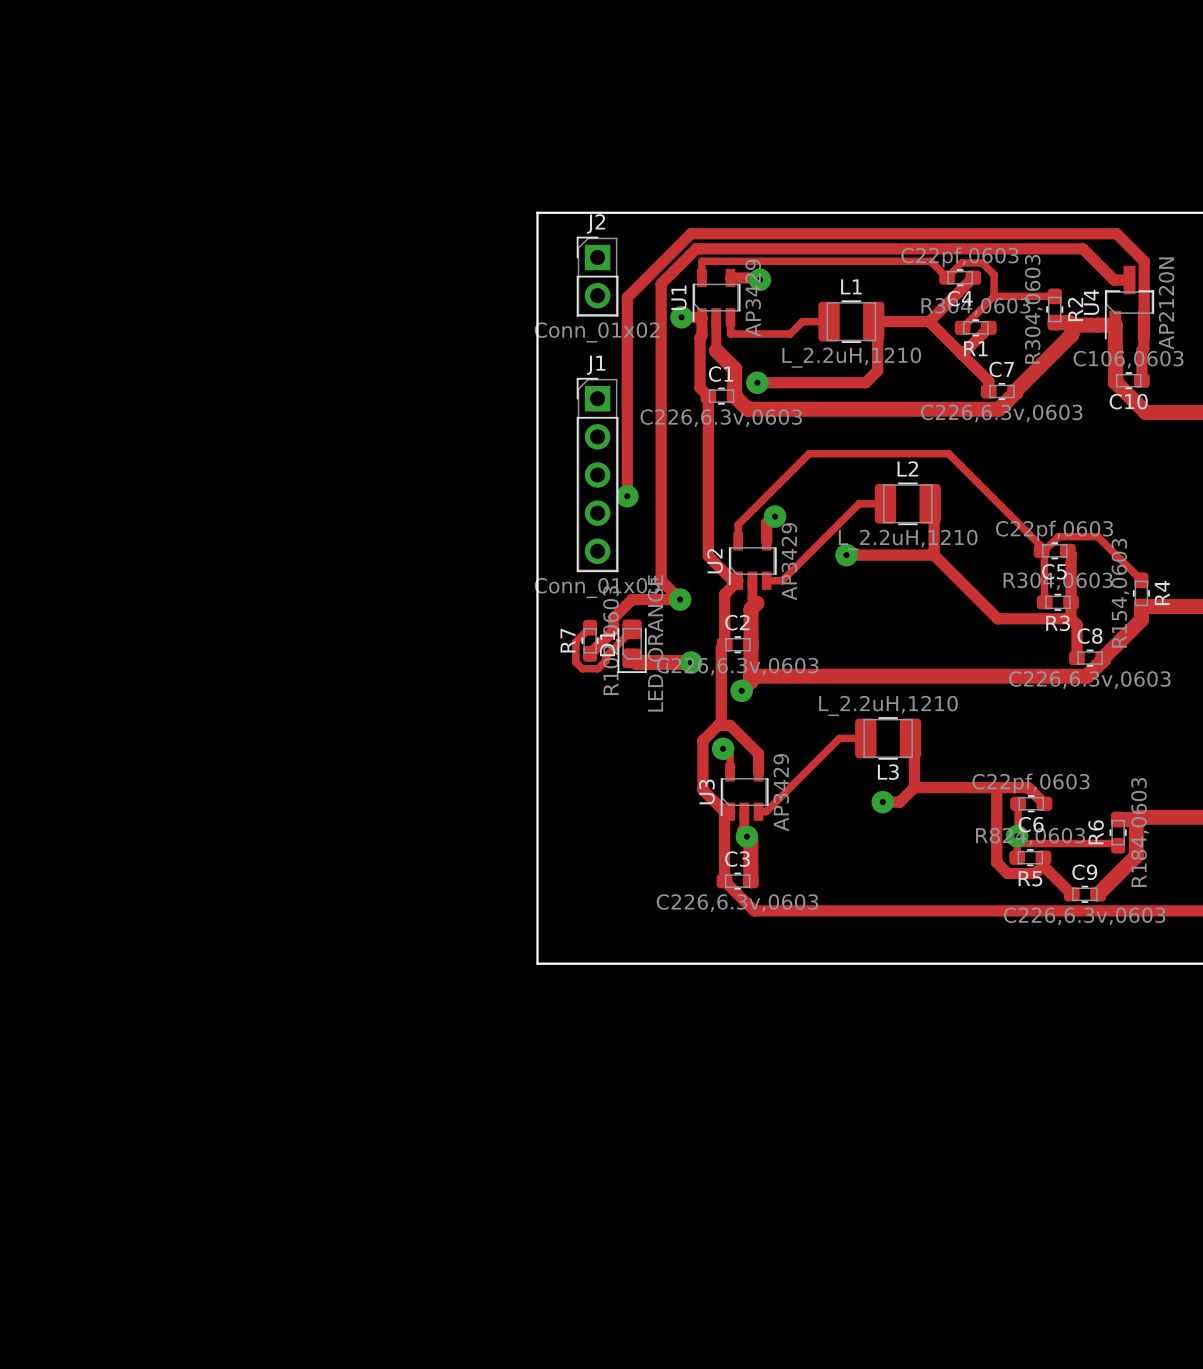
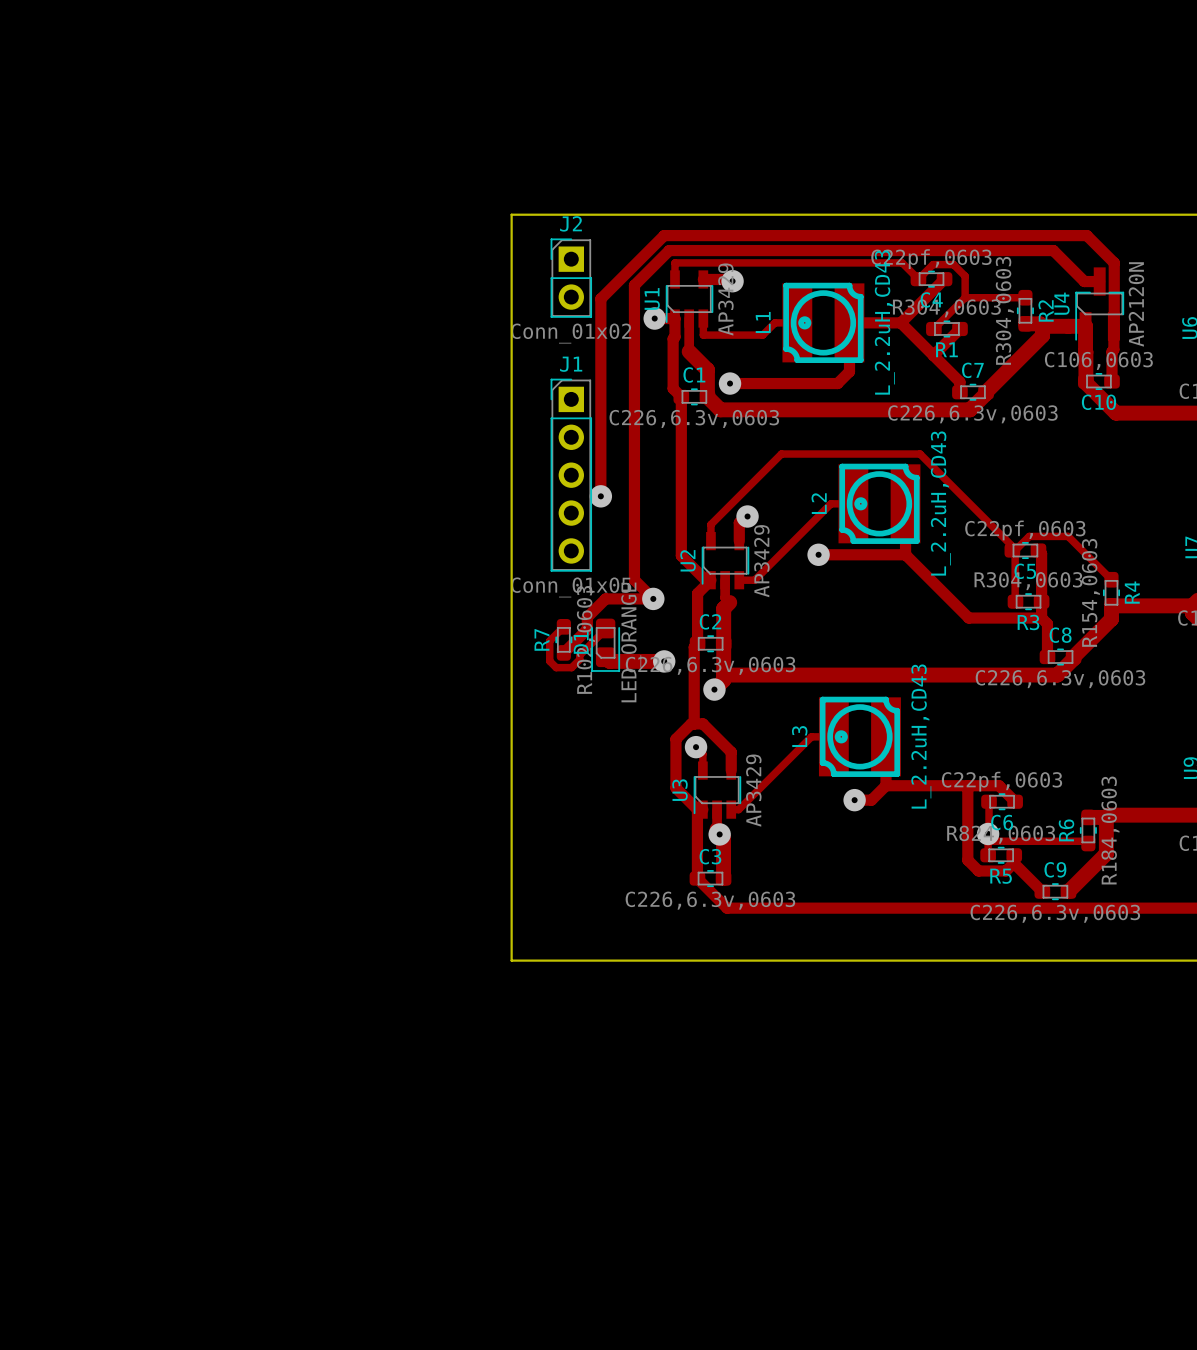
L1 name position: L1 (851, 286) -> L1 (763, 322)
L1 footprint: [818, 300, 885, 343] -> [782, 282, 865, 364]
L1 value: L_2.2uH,1210 (851, 357) -> L_2.2uH,CD43 (884, 322)
L2 name position: L2 (907, 468) -> L2 (819, 503)
L2 footprint: [874, 482, 941, 526] -> [838, 463, 921, 544]
L2 value: L_2.2uH,1210 (908, 539) -> L_2.2uH,CD43 (940, 503)
L3 value: L_2.2uH,1210 (888, 705) -> L_2.2uH,CD43 (921, 736)
L3 footprint: [855, 717, 922, 760] -> [818, 696, 901, 777]
L3 name position: L3 (888, 772) -> L3 (799, 736)

